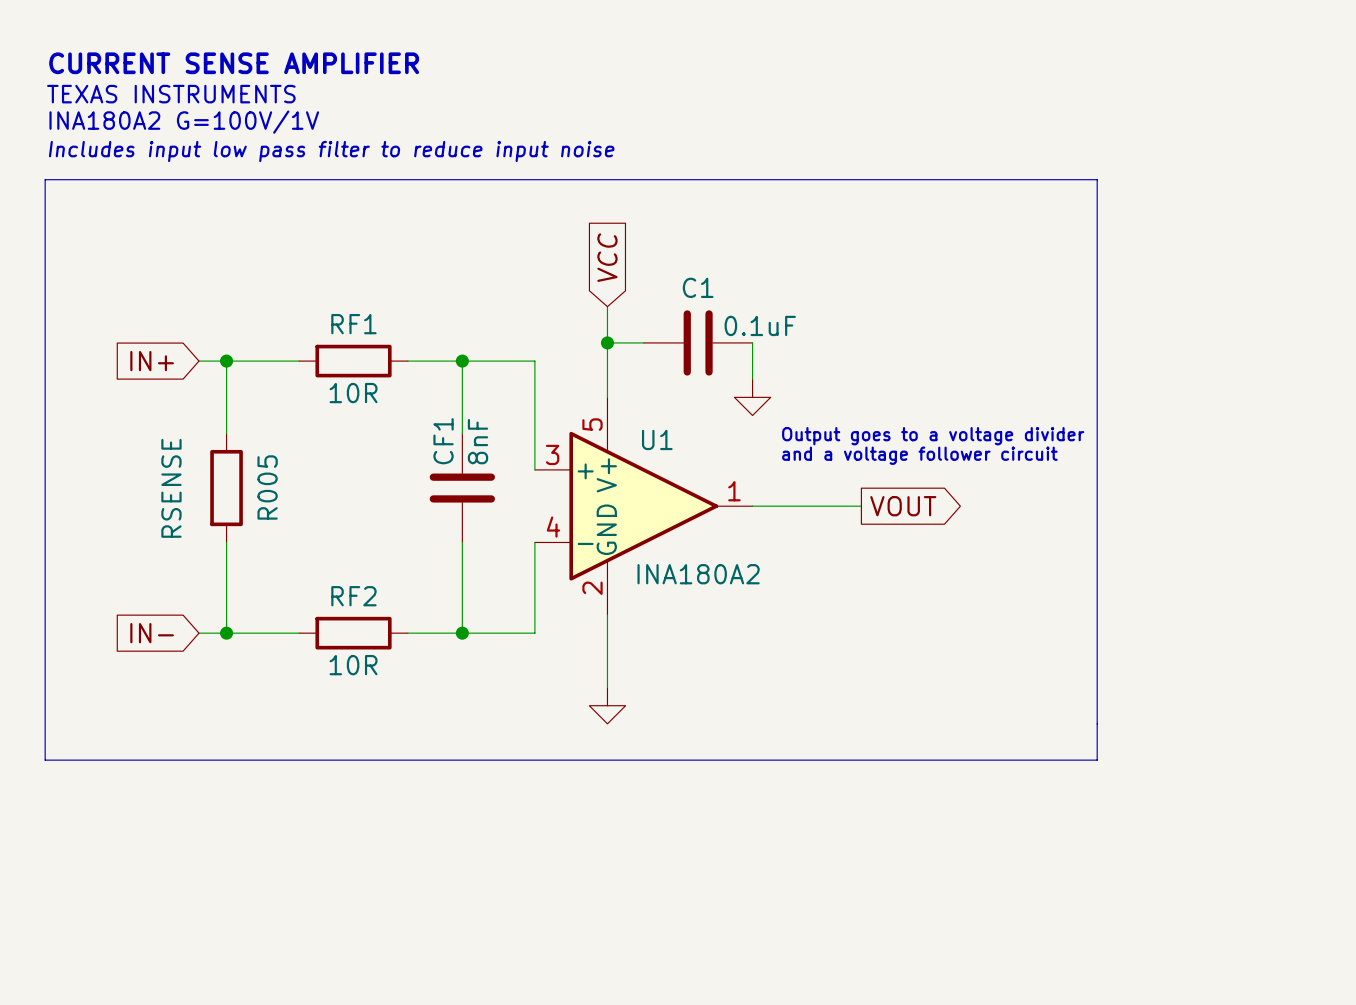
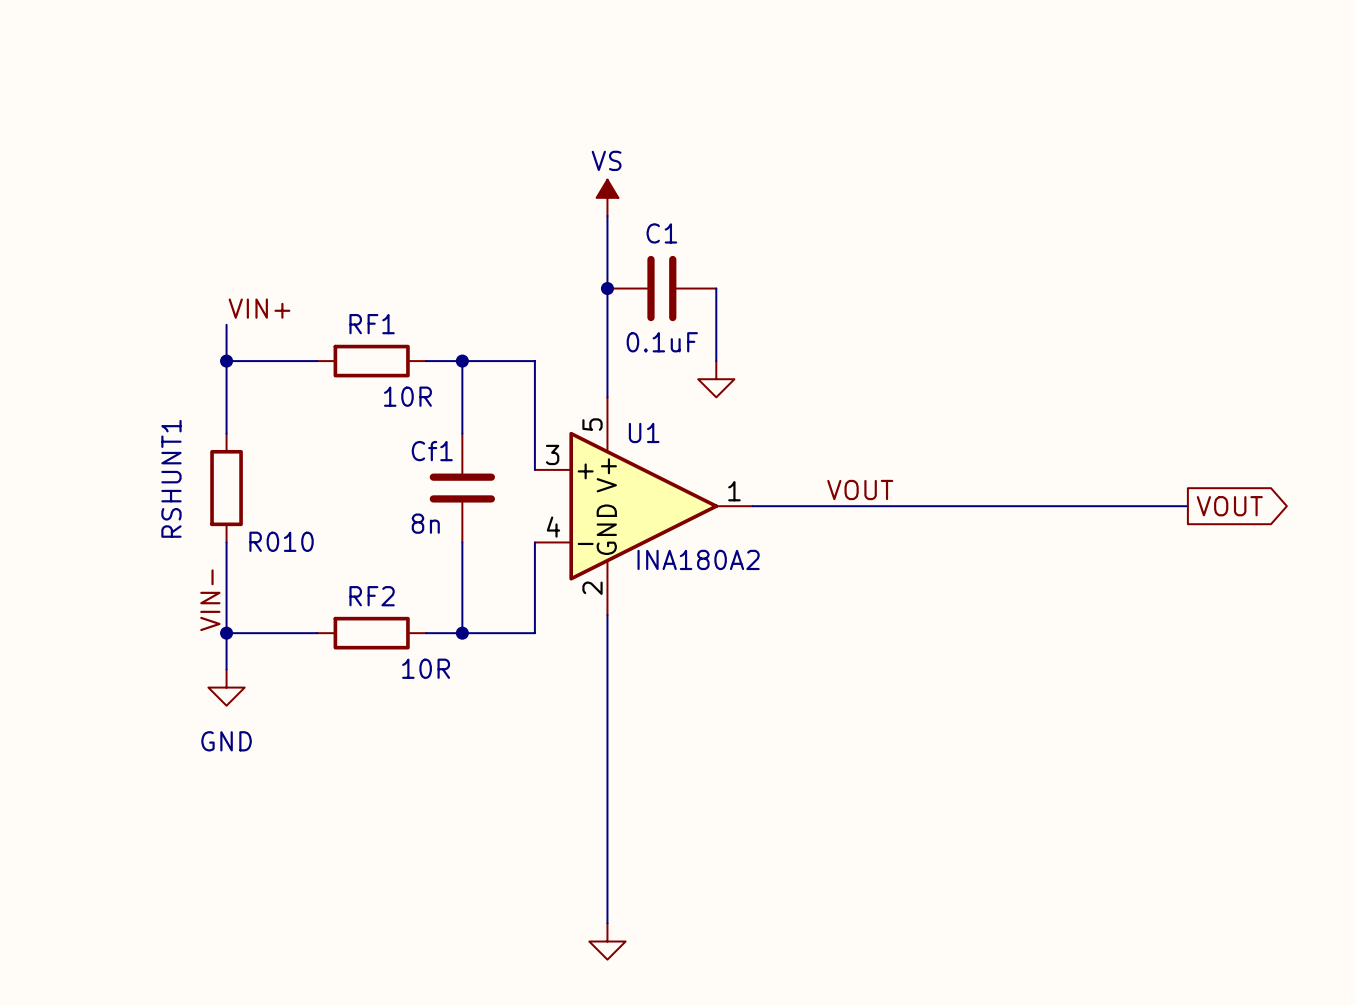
text: CURRENT SENSE AMPLIFIER (234, 63) -> none
text: TEXAS INSTRUMENTS (171, 94) -> none
text: INA180A2 G=100V/1V (184, 122) -> none
text: Includes input low pass filter to reduce input noise (331, 151) -> none
line: (45, 179) (1097, 179) (1097, 760) (45, 760) (45, 179) -> none
power symbol: none -> VS (607, 197)
wire: none -> (607, 215) (607, 306)
global label: VCC (607, 257) -> none
wire: none -> (716, 288) (716, 361)
label: none -> VIN+ (259, 308)
C1 value position: 0.1uF (760, 325) -> 0.1uF (662, 342)
wire: (607, 342) (643, 342) -> none
junction position: (607, 342) -> (607, 288)
C1 position: (698, 342) -> (661, 288)
wire: (752, 342) (752, 379) -> none
global label: IN+ (152, 361) -> none
wire: (198, 361) (226, 361) -> (226, 324) (226, 361)
RF1 position: (353, 361) -> (371, 361)
RF1 value position: 10R (353, 393) -> 10R (407, 396)
power symbol position: (752, 397) -> (716, 379)
text: Output goes to a voltage divider (933, 436) -> none
U1 name position: U1 (657, 439) -> U1 (644, 432)
CF1 name: CF1 (443, 441) -> Cf1 (432, 451)
CF1 value: 8nF (478, 441) -> 8n (425, 523)
text: and a voltage follower circuit (919, 455) -> none
RSENSE value: R005 (267, 487) -> R010 (281, 541)
RSENSE name: RSENSE (171, 488) -> RSHUNT1 (171, 478)
label: none -> VOUT (860, 490)
wire: none -> (861, 506) (1187, 506)
global label position: VOUT (903, 506) -> VOUT (1229, 506)
U1 value position: INA180A2 (698, 574) -> INA180A2 (698, 559)
label: none -> VIN- (210, 600)
global label: IN- (152, 633) -> none
wire: (198, 633) (226, 633) -> (226, 669) (226, 633)
RF2 position: (353, 633) -> (371, 633)
RF2 value position: 10R (353, 665) -> 10R (426, 668)
power symbol: none -> GND (226, 687)
wire: none -> (607, 687) (607, 923)
power symbol: (607, 705) -> none
power symbol: none -> (607, 941)

